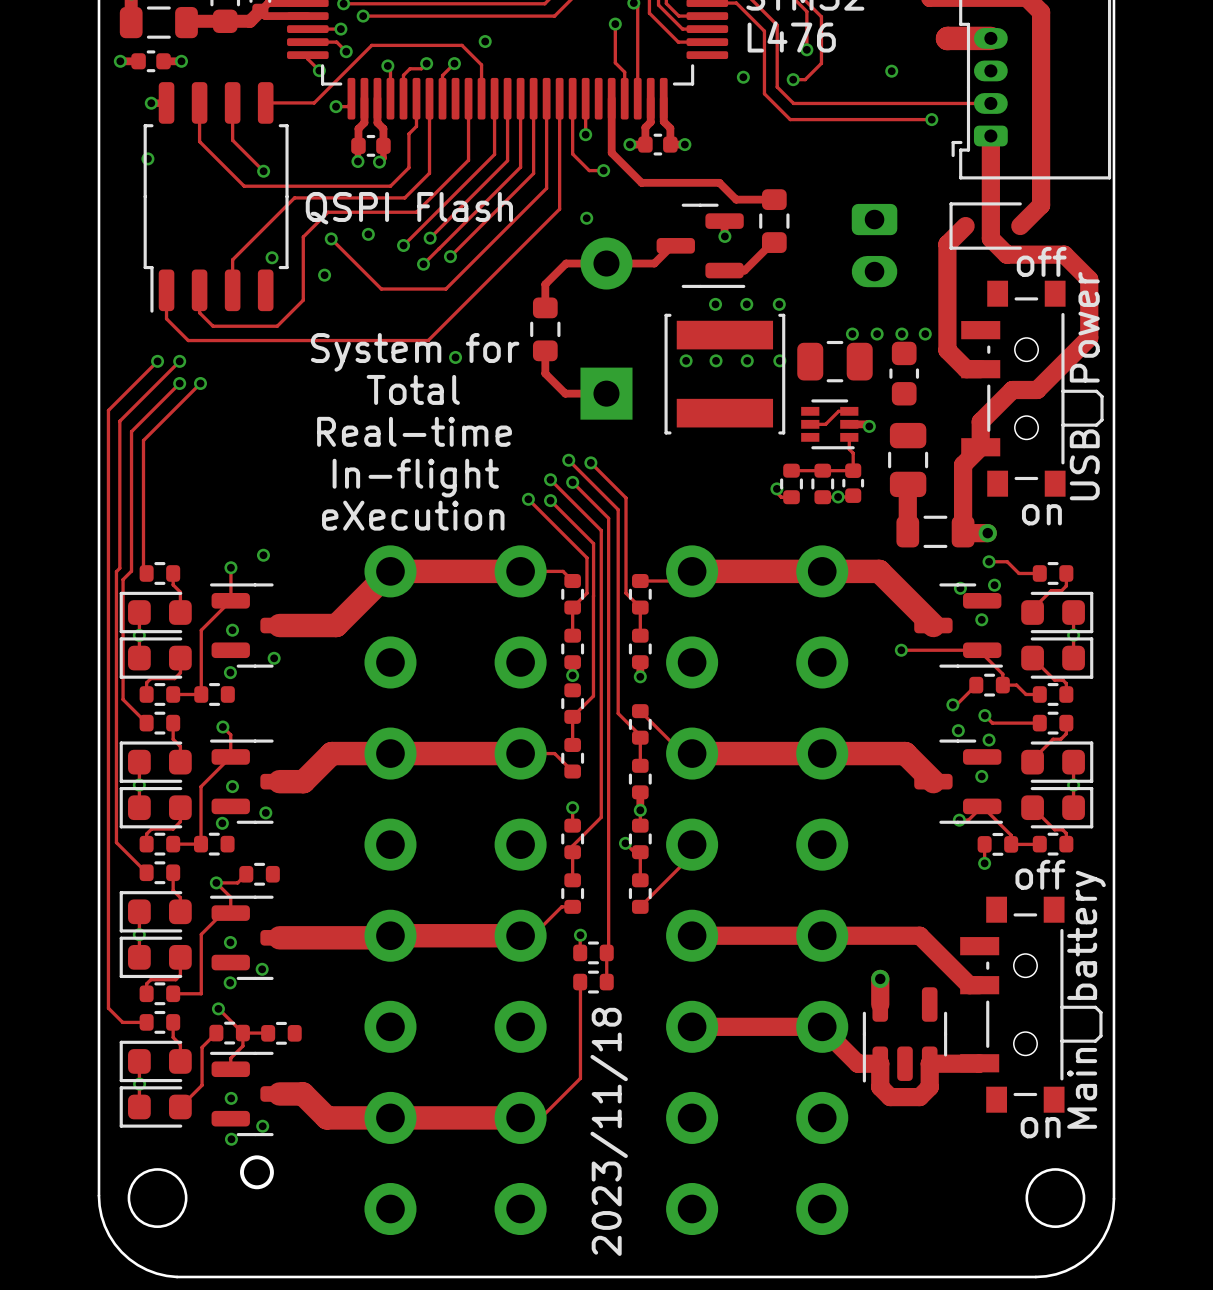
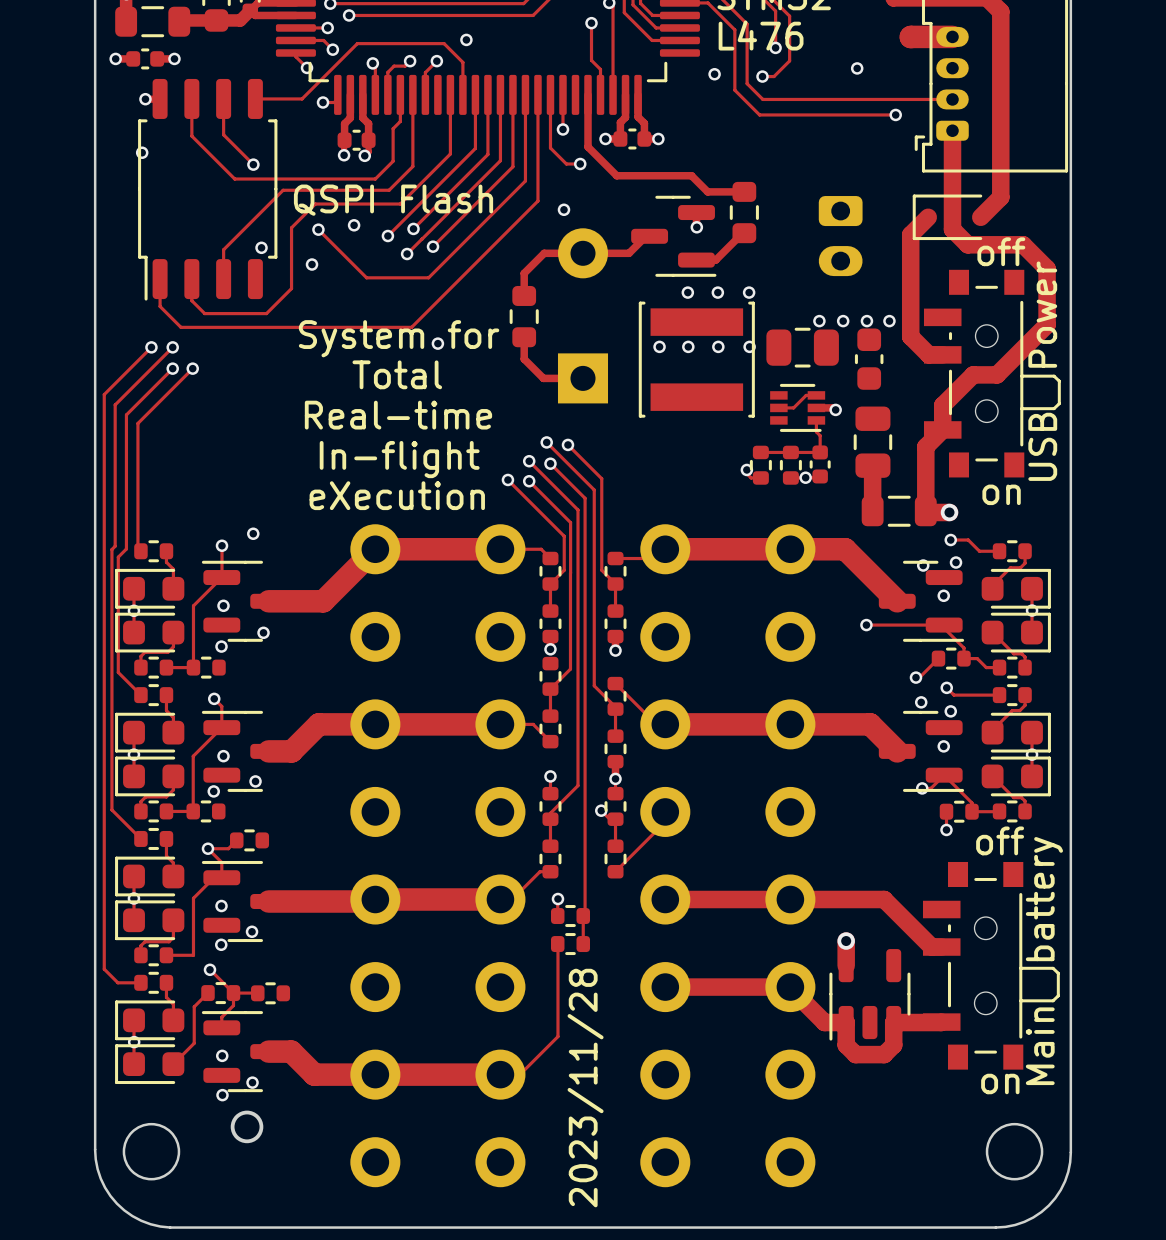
text: 2023/11/18 (609, 1131) -> 2023/11/28 (585, 1088)

